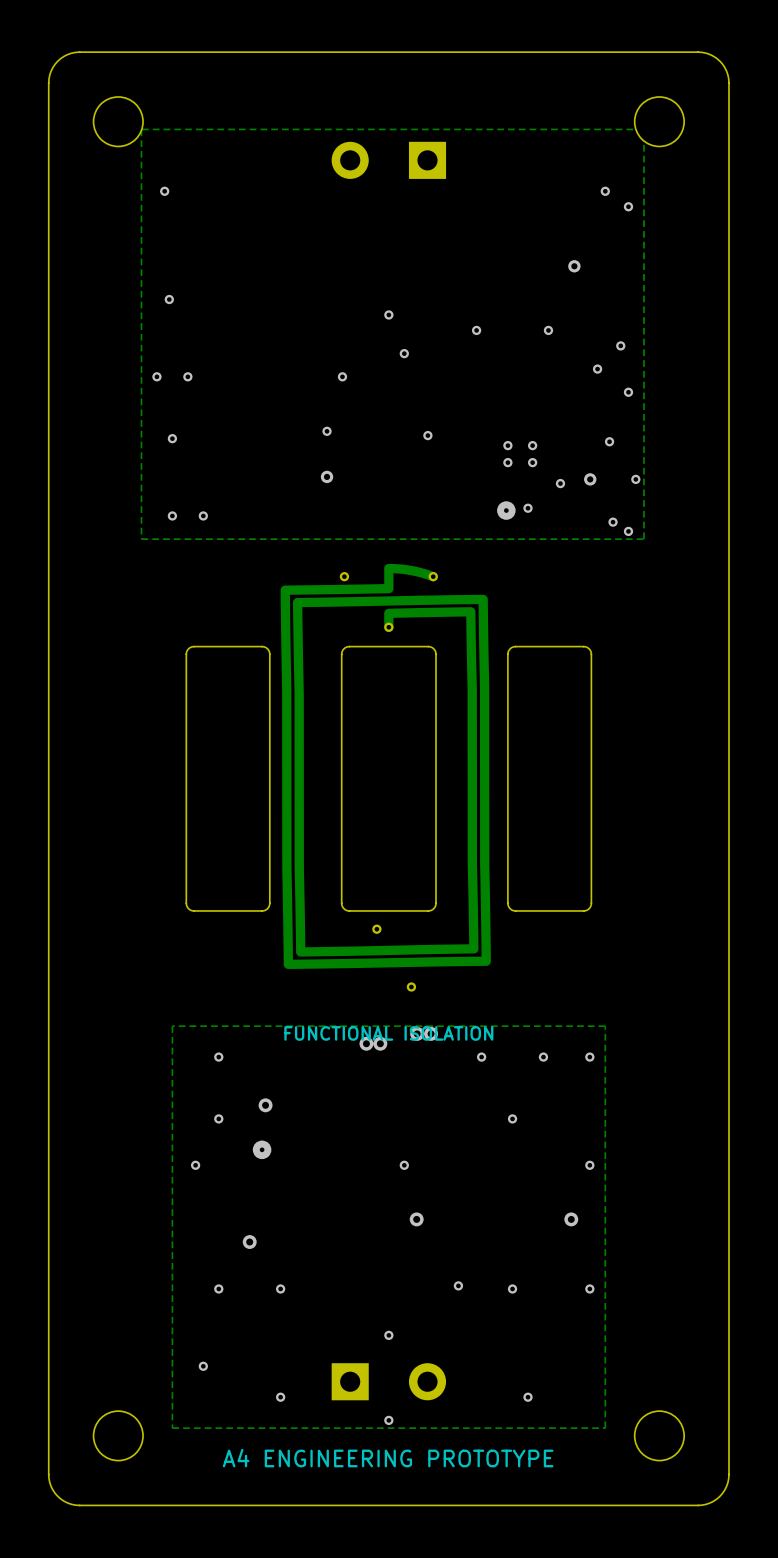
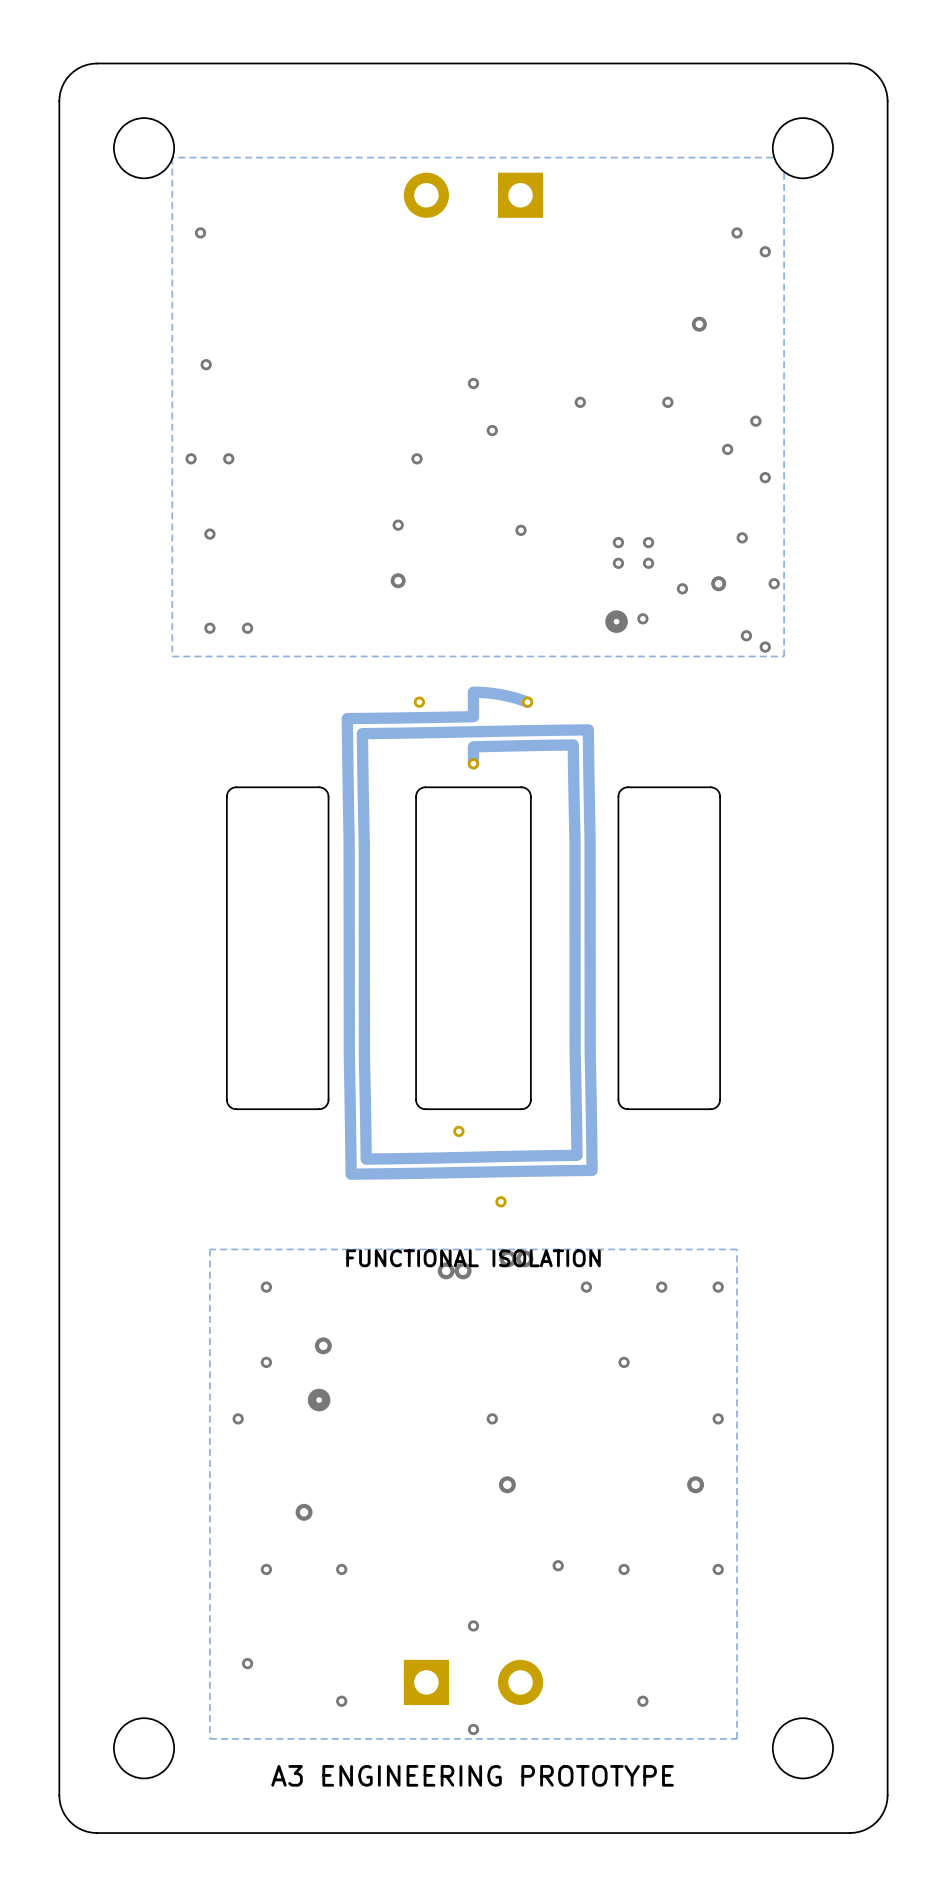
text: A4 ENGINEERING PROTOTYPE (388, 1458) -> A3 ENGINEERING PROTOTYPE (472, 1775)

